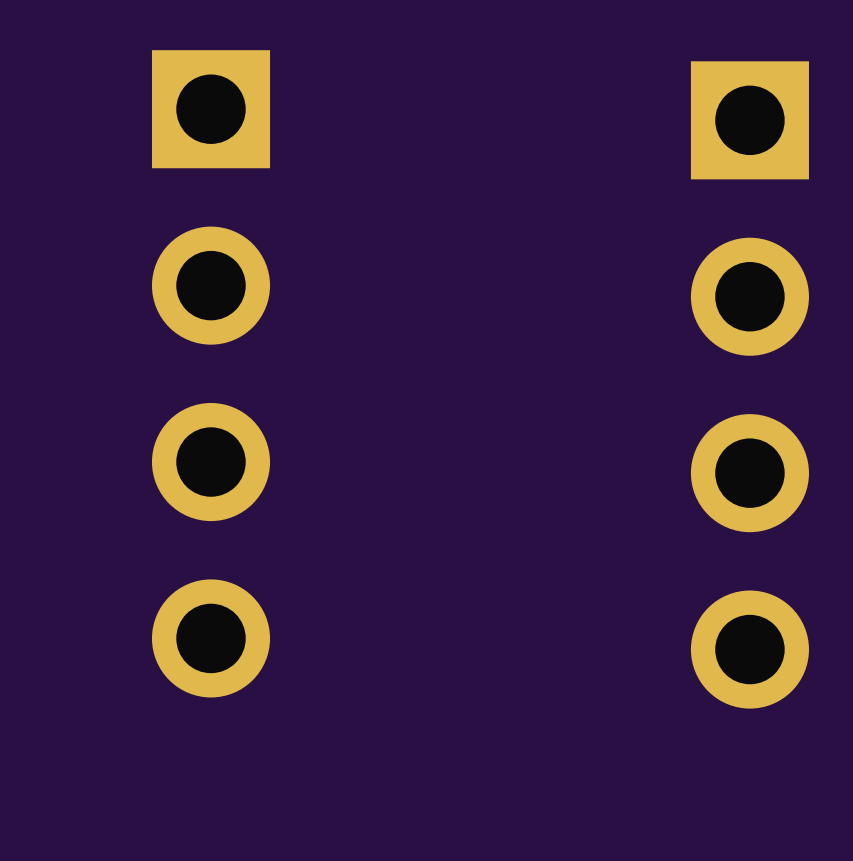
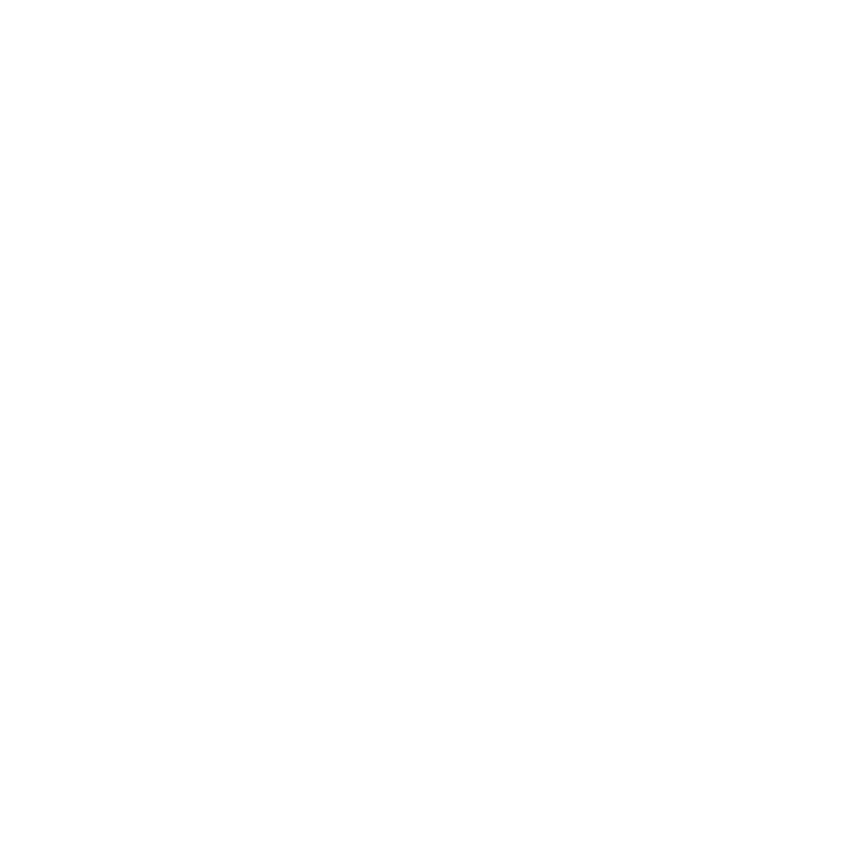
part: (211, 373) -> none
part: (749, 384) -> none

